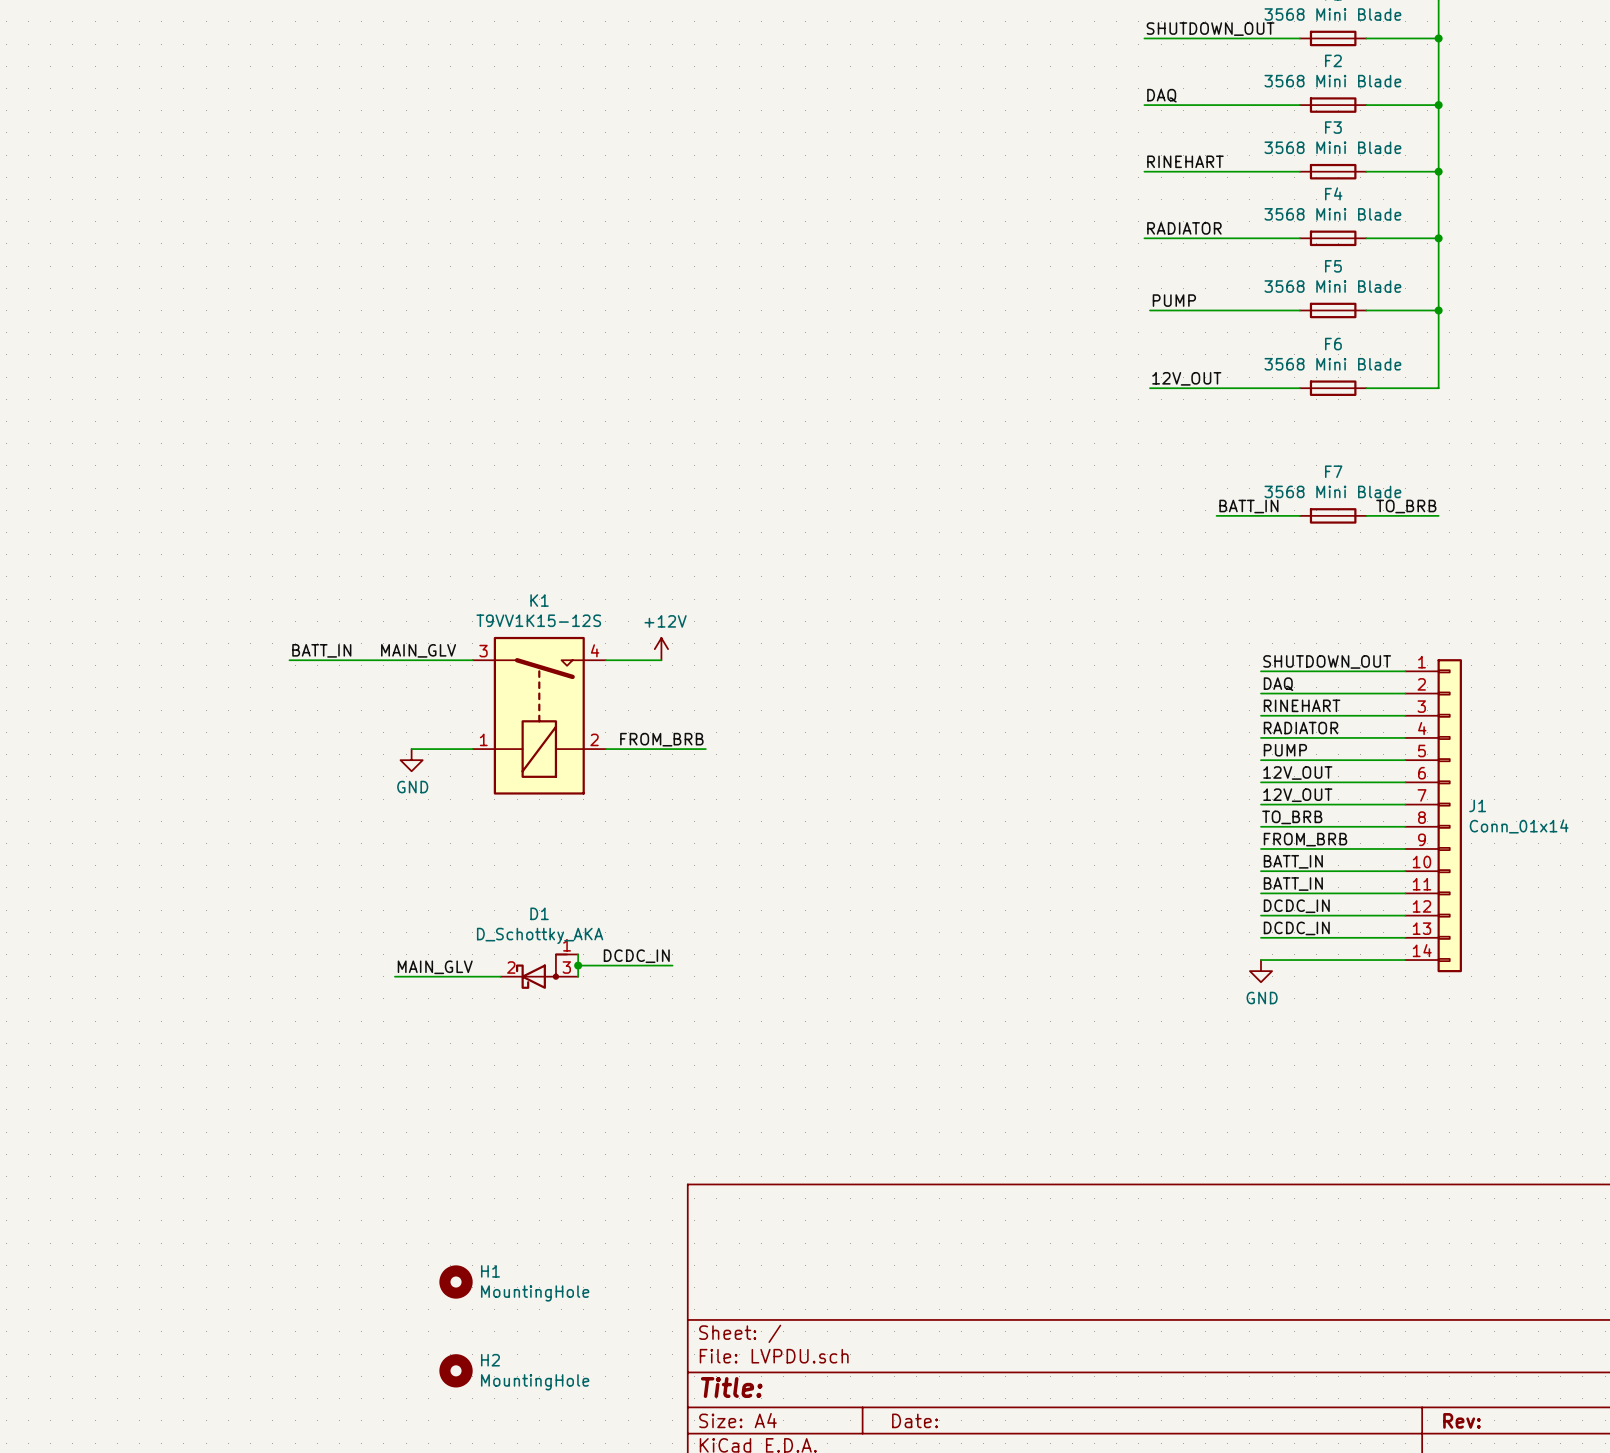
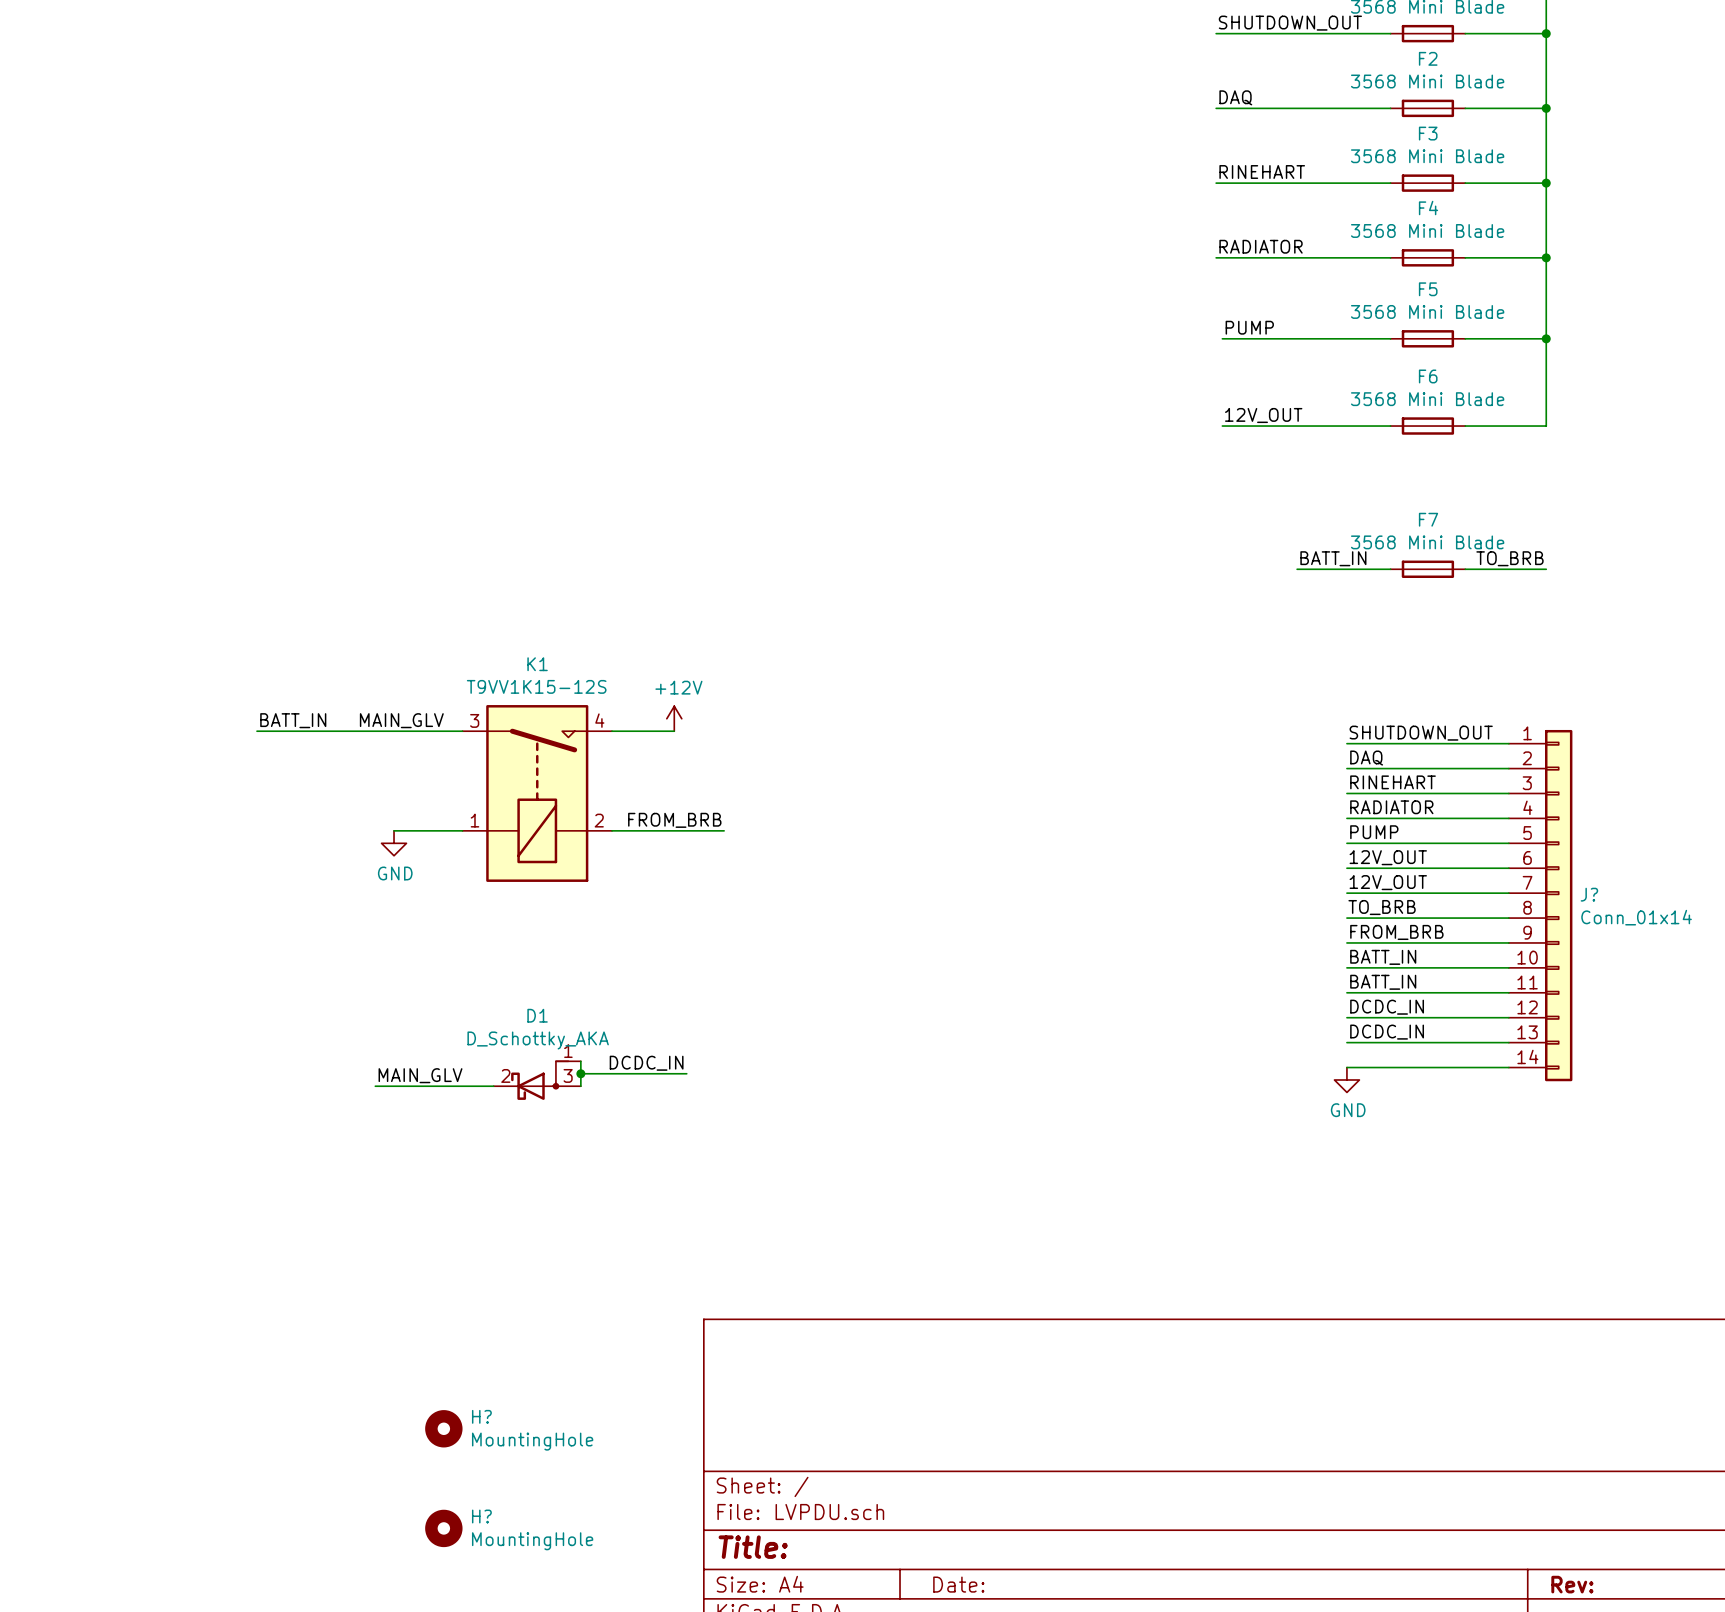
J1 name: J1 (1477, 805) -> J? (1589, 894)
H1 name: H1 (490, 1271) -> H? (481, 1416)
H2 name: H2 (490, 1360) -> H? (481, 1516)

